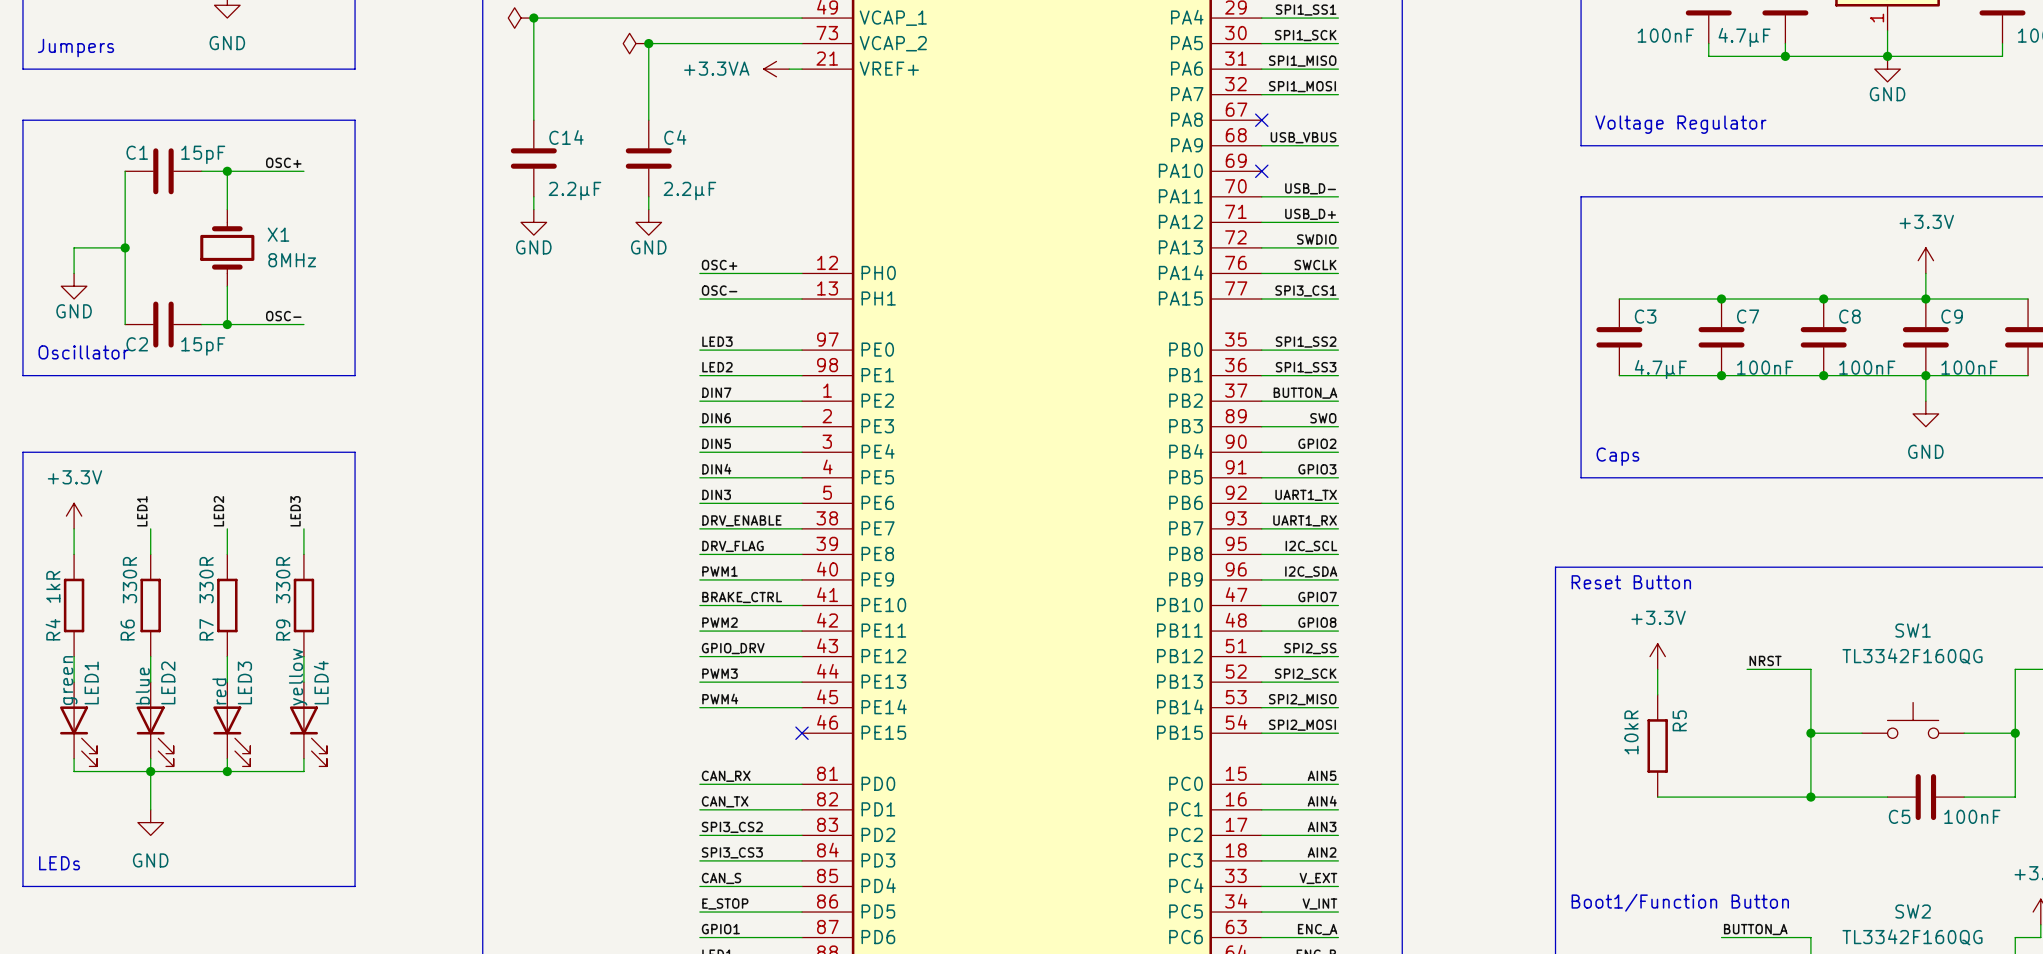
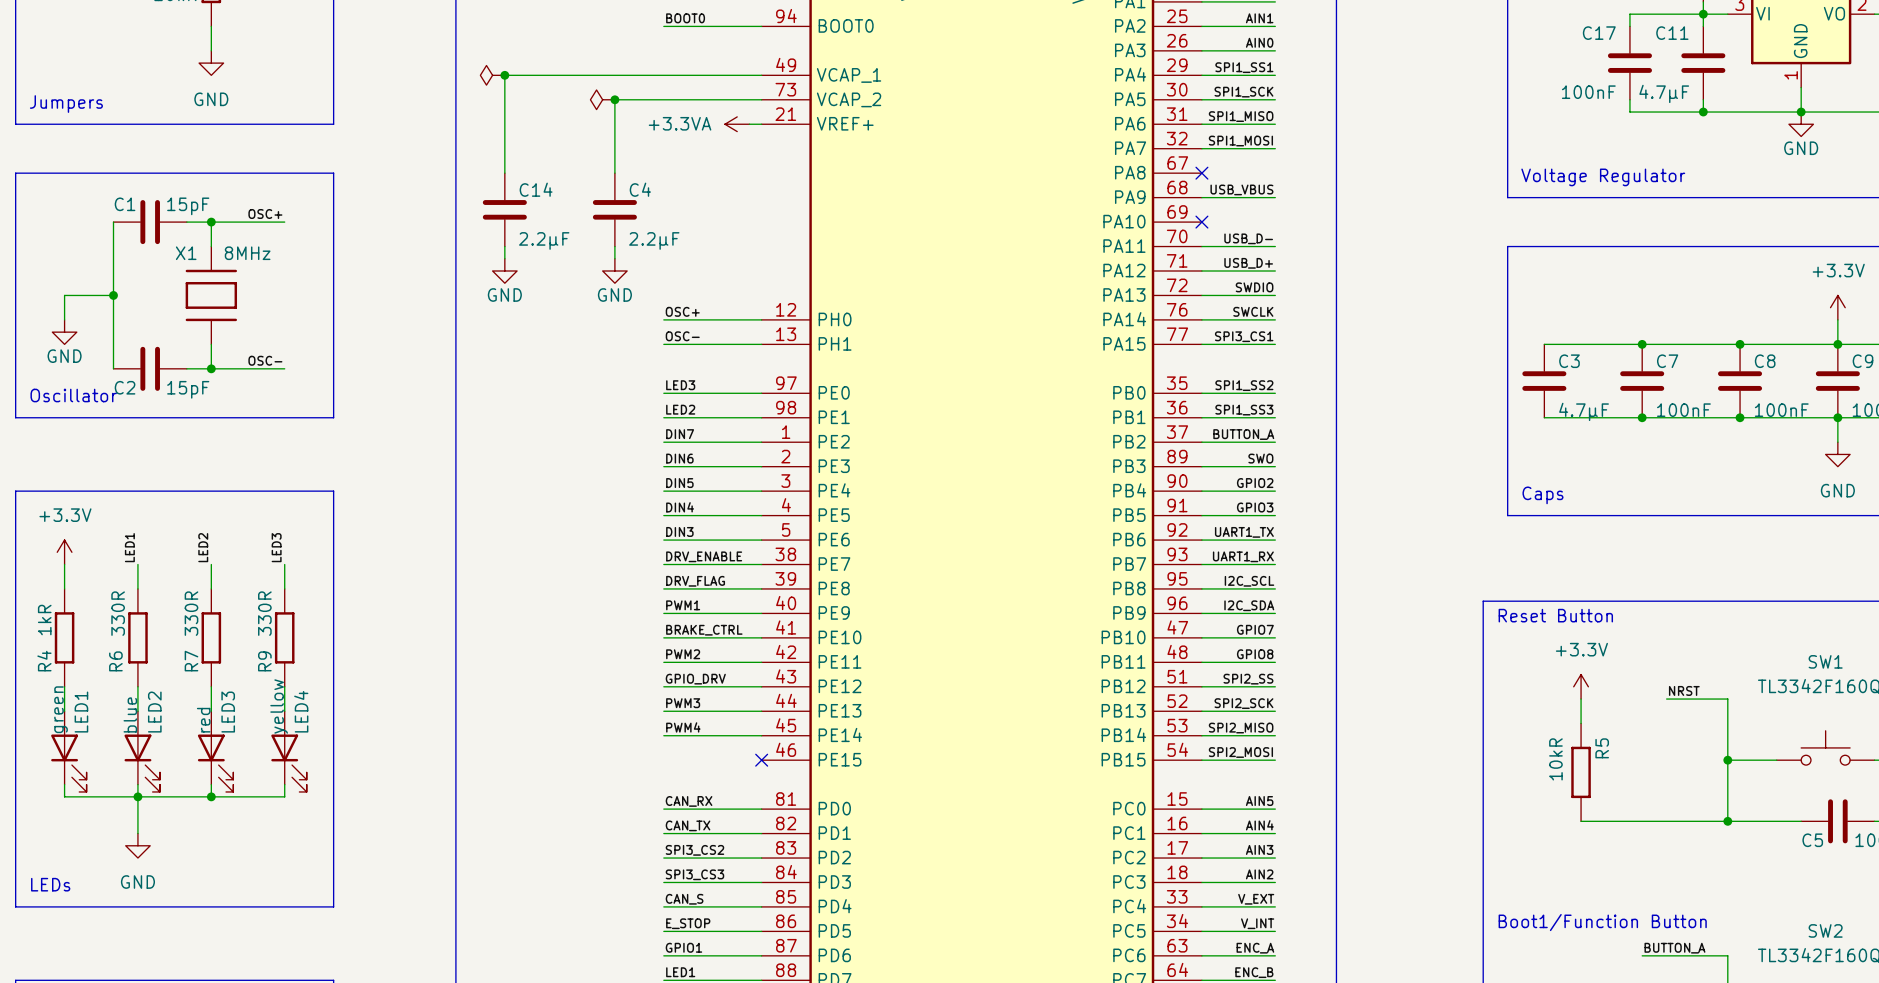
X1 symbol: [200, 209, 255, 287] -> [185, 246, 238, 345]
X1 name position: X1 (278, 234) -> X1 (186, 253)
X1 value position: 8MHz (292, 260) -> 8MHz (247, 253)

